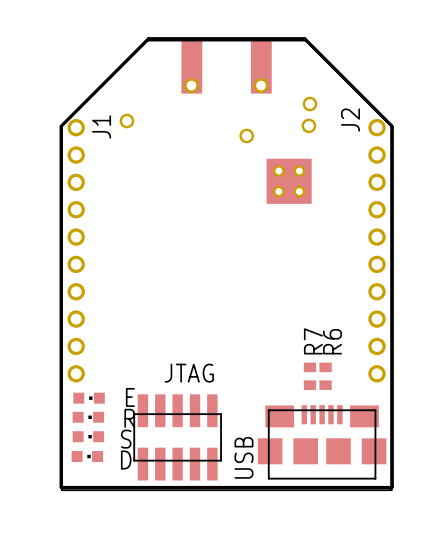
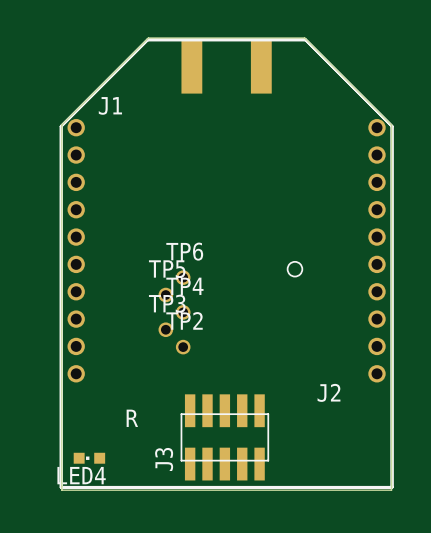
part: (191, 85) -> none
part: (260, 85) -> none
part: (309, 104) -> none
J2 name rotation: 0° (350, 120) -> 90° clockwise (329, 392)
J2 name position: J2 (350, 120) -> J2 (329, 392)
part: (126, 121) -> none
part: (308, 125) -> none
J1 name rotation: 0° (101, 126) -> 90° clockwise (110, 105)
part: (246, 135) -> none
part: (289, 181) -> none
part: none -> (294, 269)
TP6: none -> (183, 277)
TP5: none -> (165, 295)
TP4: none -> (183, 312)
TP3: none -> (165, 329)
TP2: none -> (183, 347)
text: JTAG (189, 373) -> none
R7: (309, 376) -> none
R6: (325, 376) -> none
text: E (130, 397) -> none
part: (89, 398) -> none
part: (88, 417) -> none
part: (88, 436) -> none
part: (177, 437) -> none
J3: none -> (224, 437)
text: S (126, 439) -> none
part: (322, 442) -> none
part: (87, 456) -> none
text: USB (243, 457) -> none
LED4: none -> (89, 458)
text: D (126, 459) -> none

